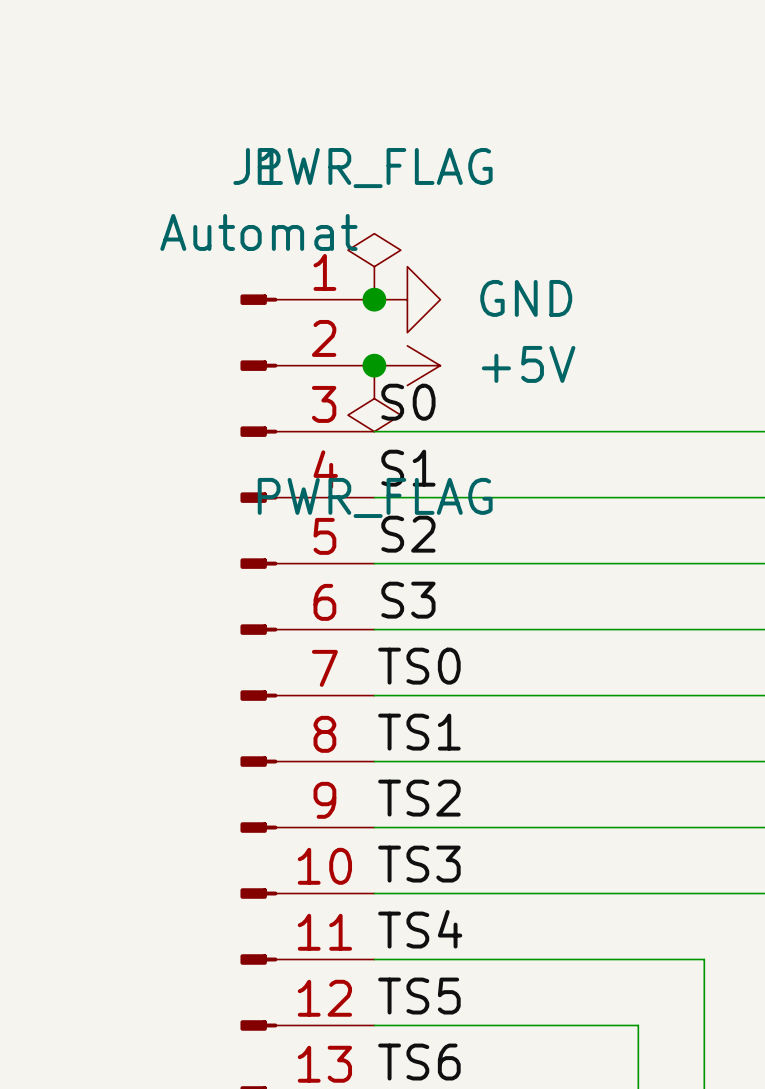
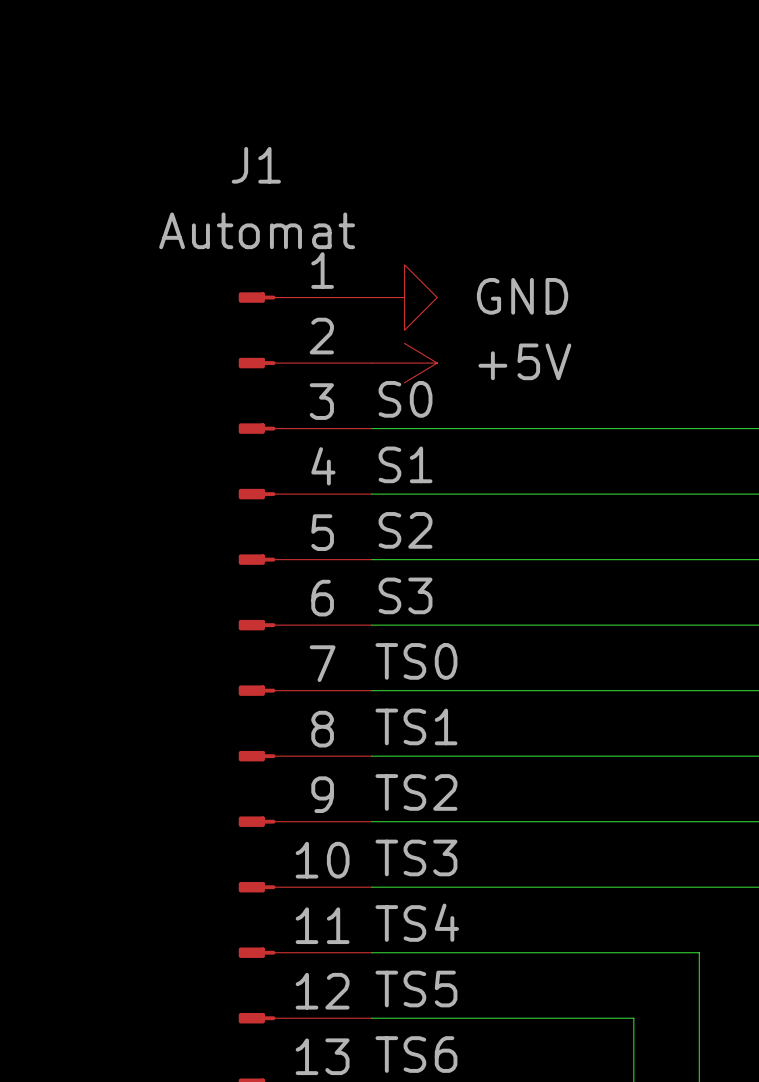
power symbol: PWR_FLAG (374, 266) -> none
junction: (374, 299) -> none
junction: (374, 365) -> none
power symbol: PWR_FLAG (374, 398) -> none

